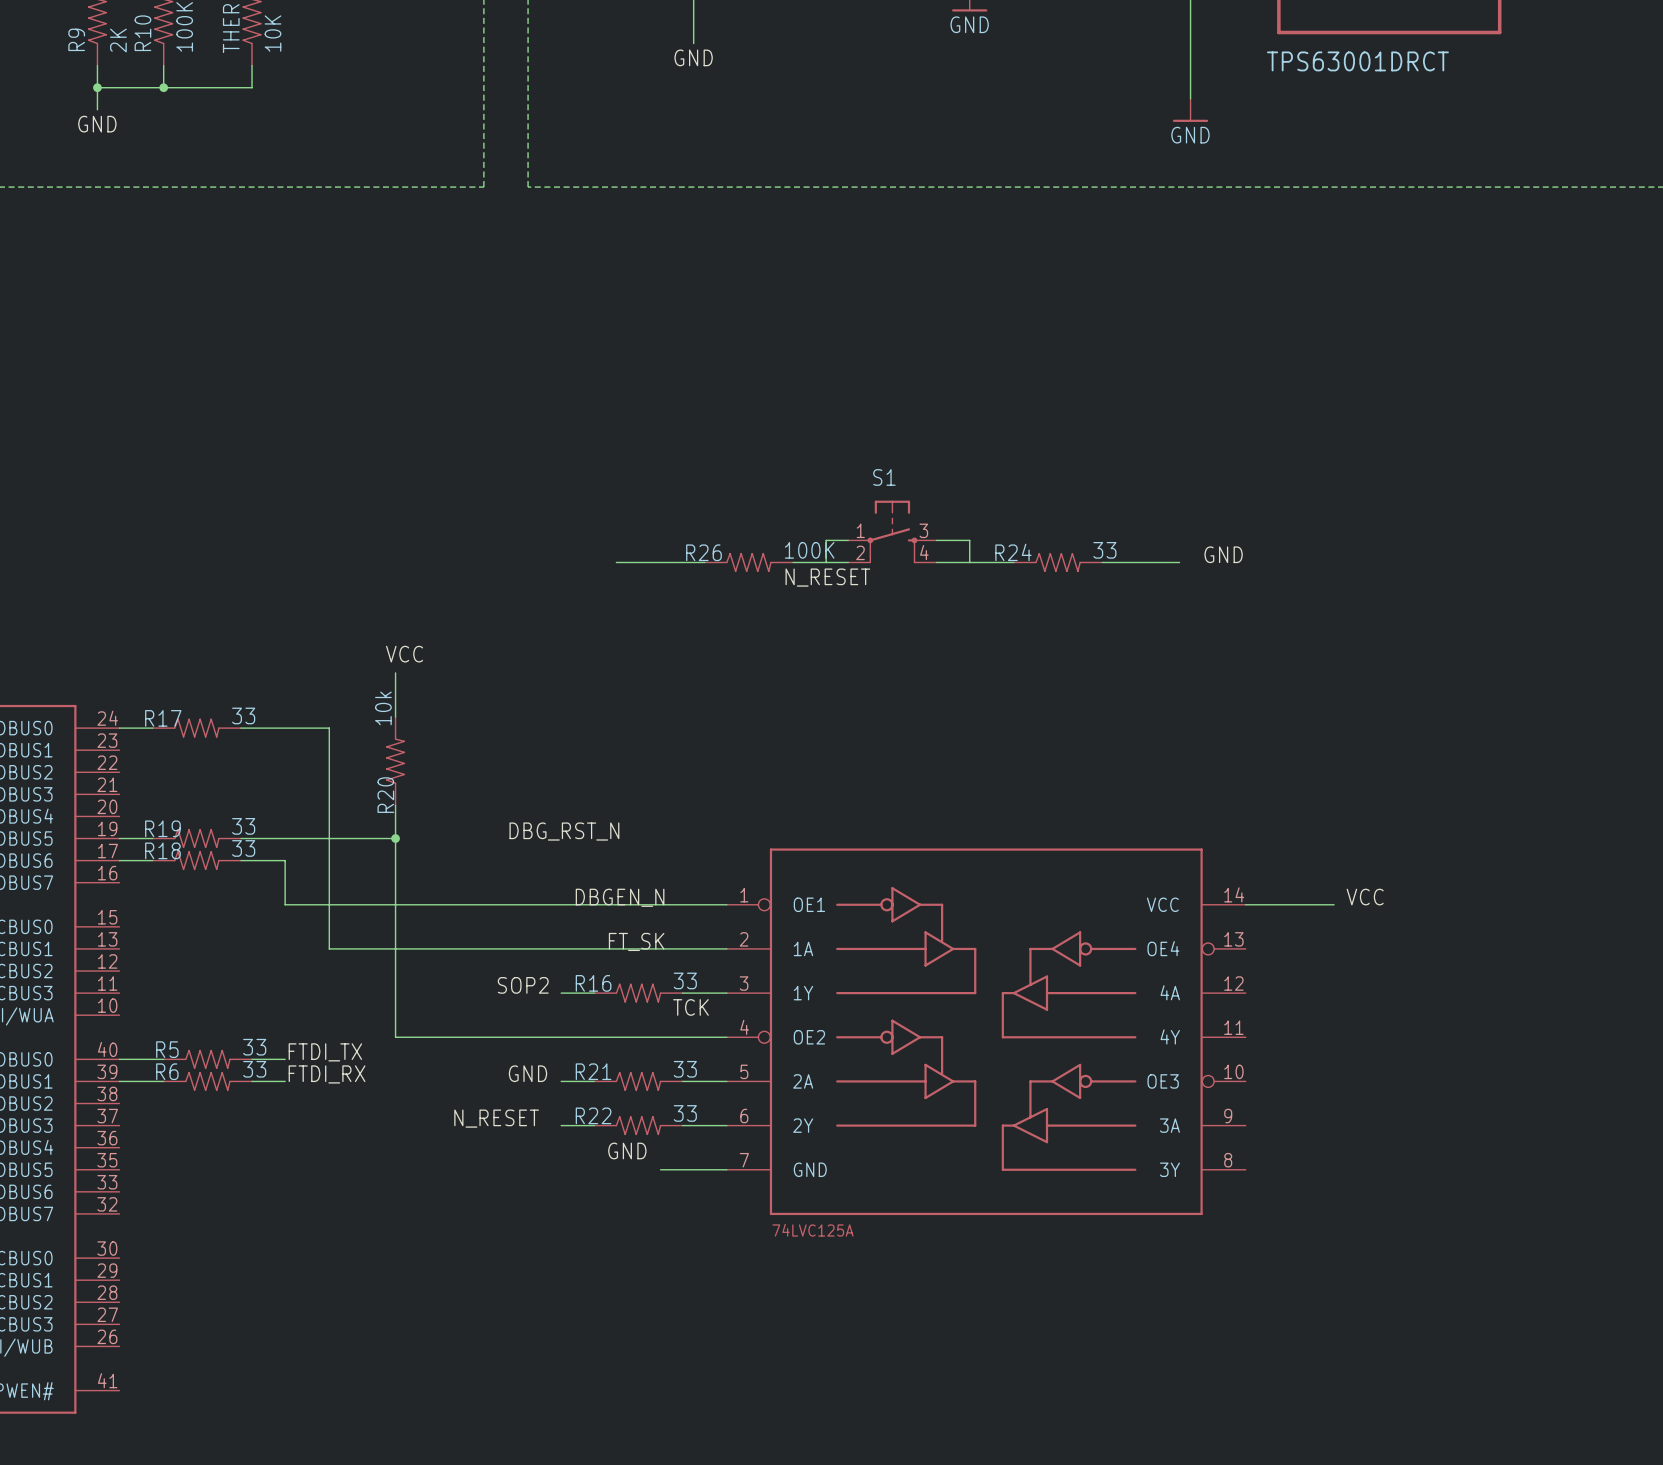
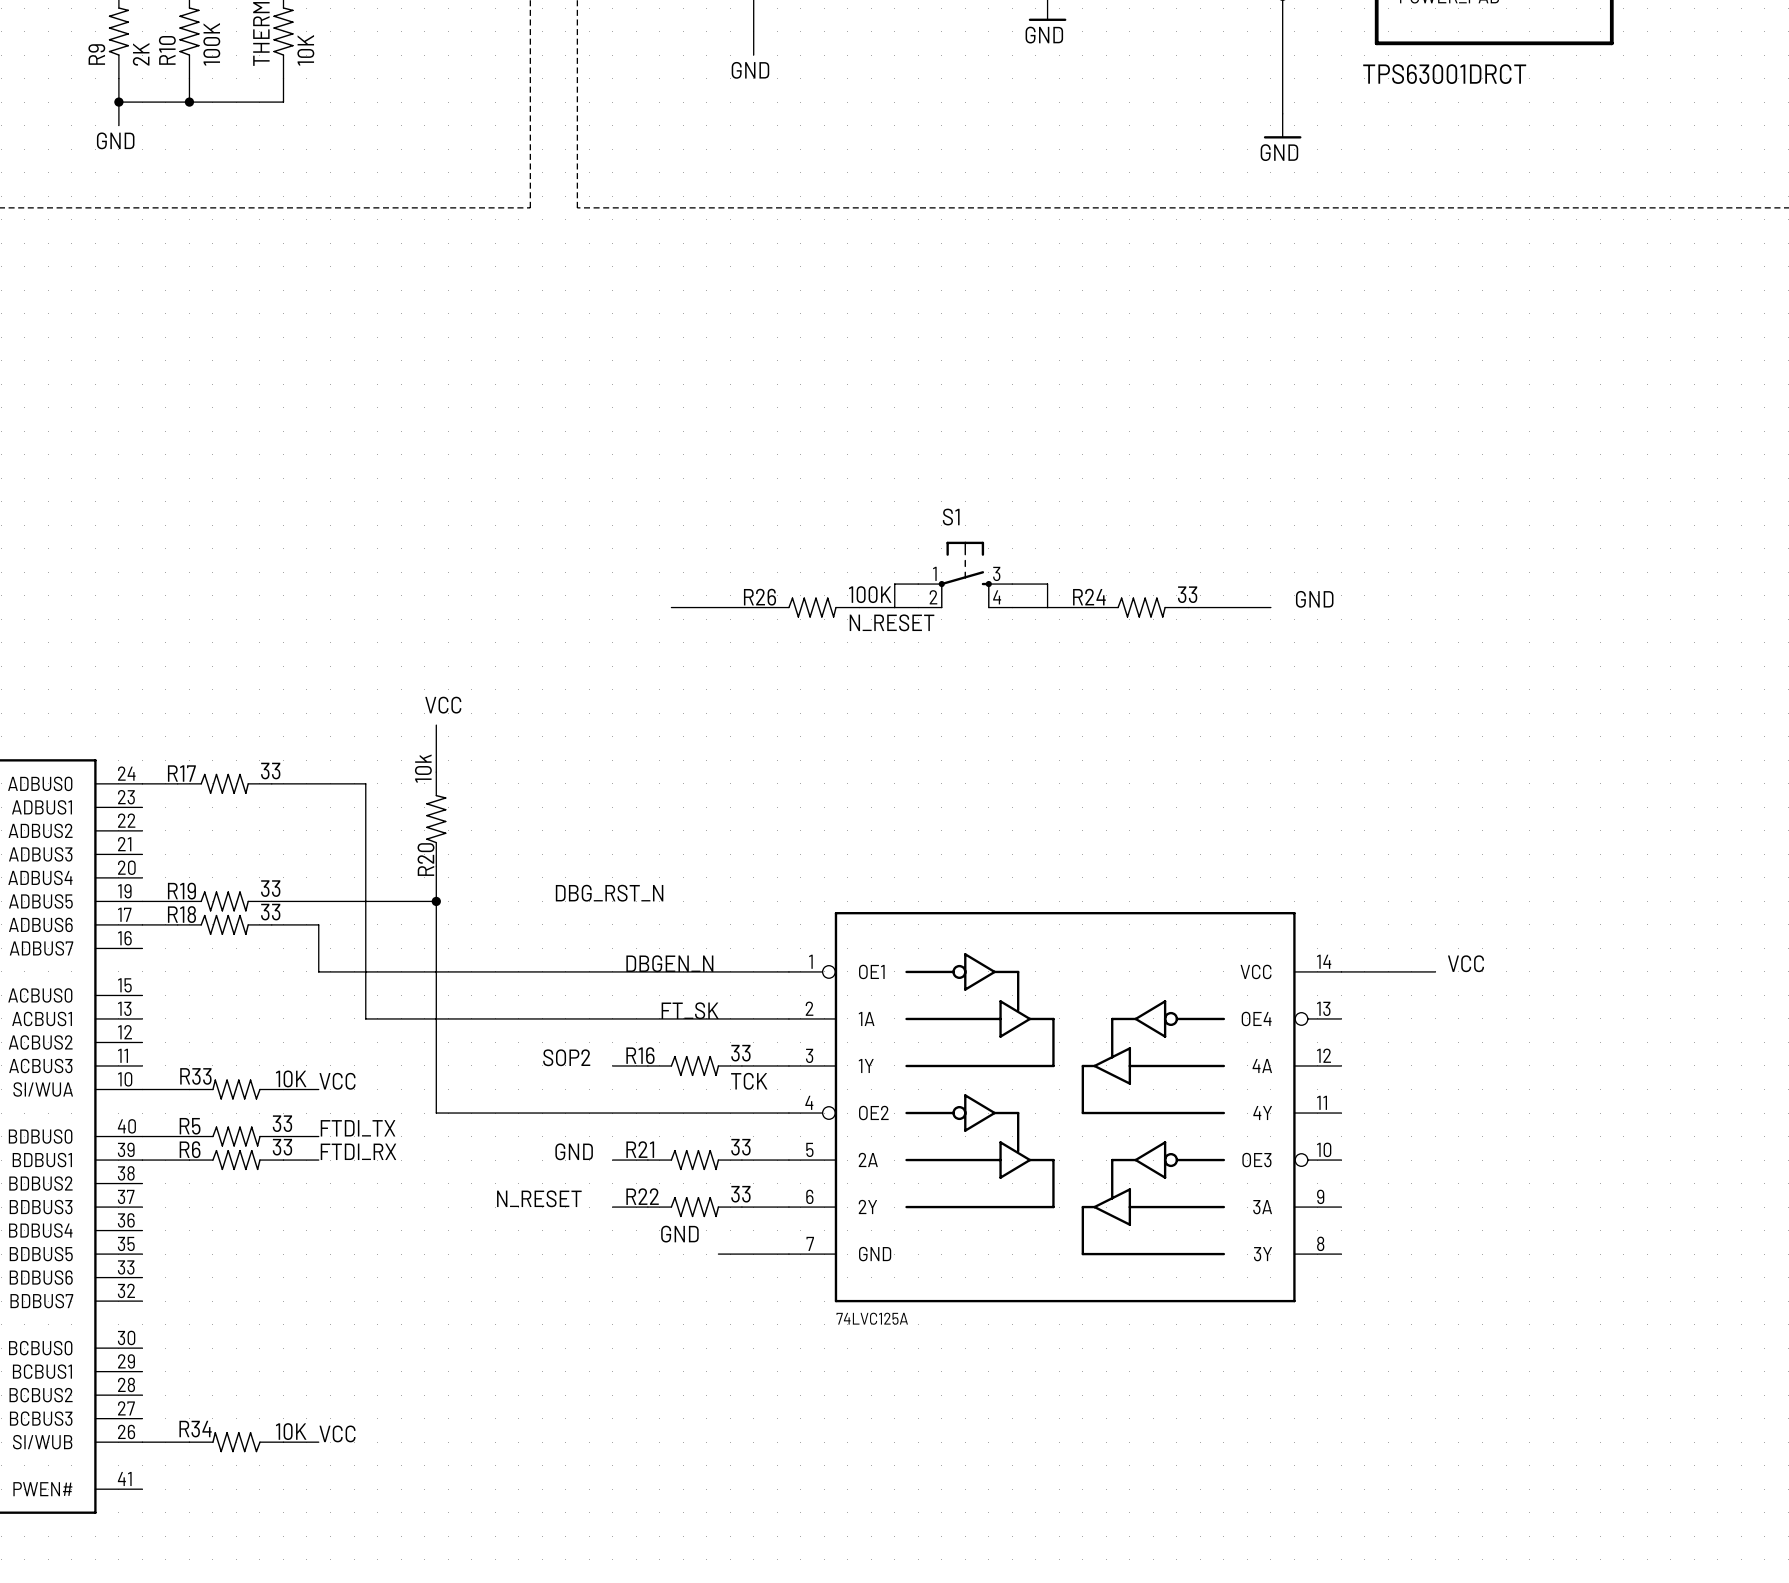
label: none -> VCC (337, 1081)
wire: none -> (142, 1089) (189, 1089)
R33: none -> 10K (236, 1089)
wire: none -> (283, 1089) (318, 1089)
label: none -> VCC (337, 1433)
wire: none -> (142, 1442) (189, 1442)
R34: none -> 10K (236, 1442)
wire: none -> (283, 1442) (318, 1442)

